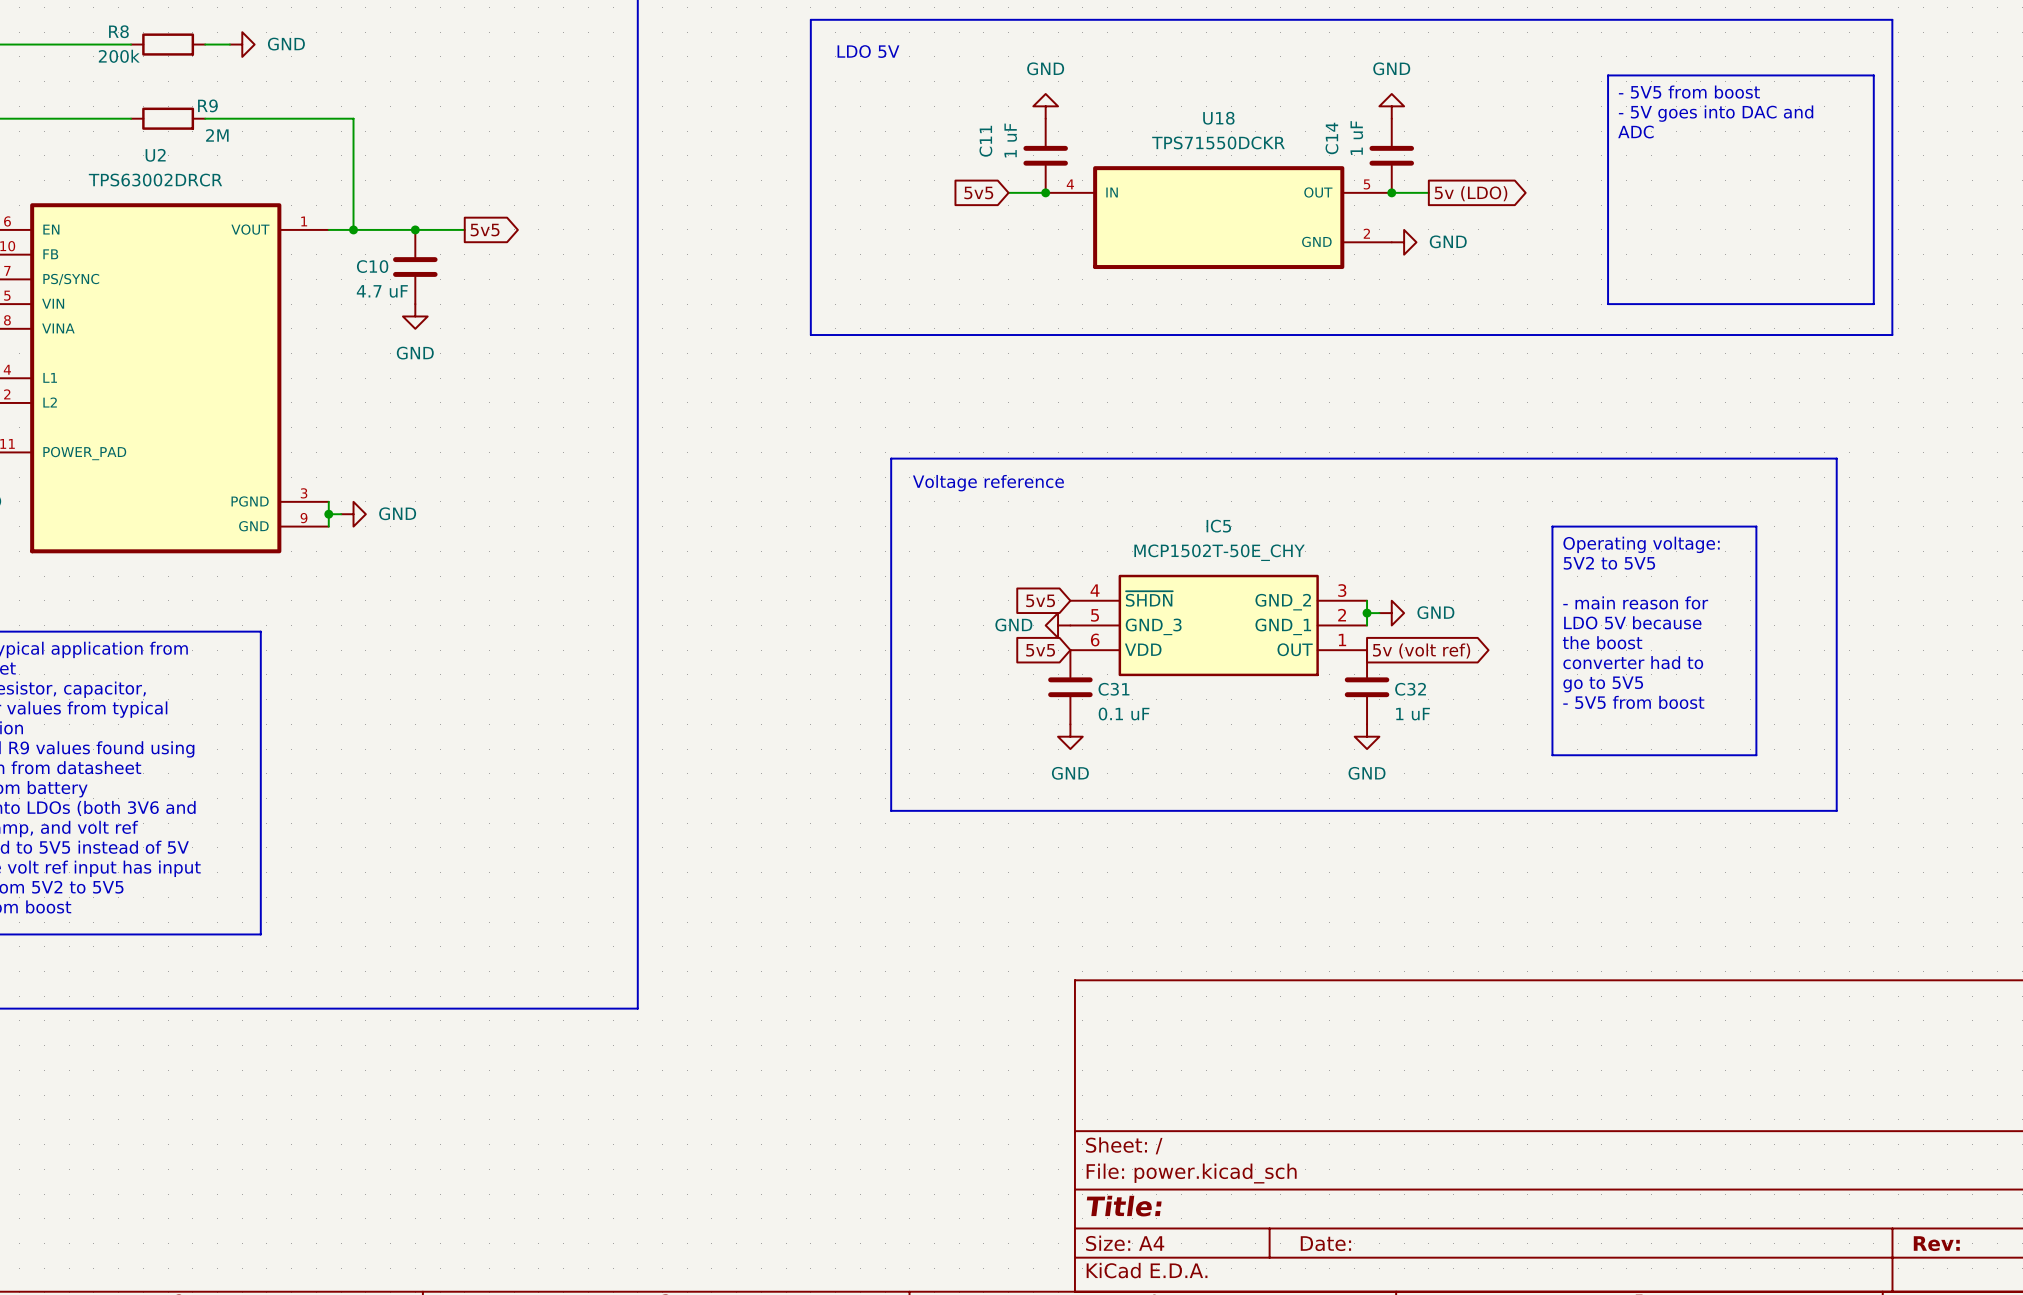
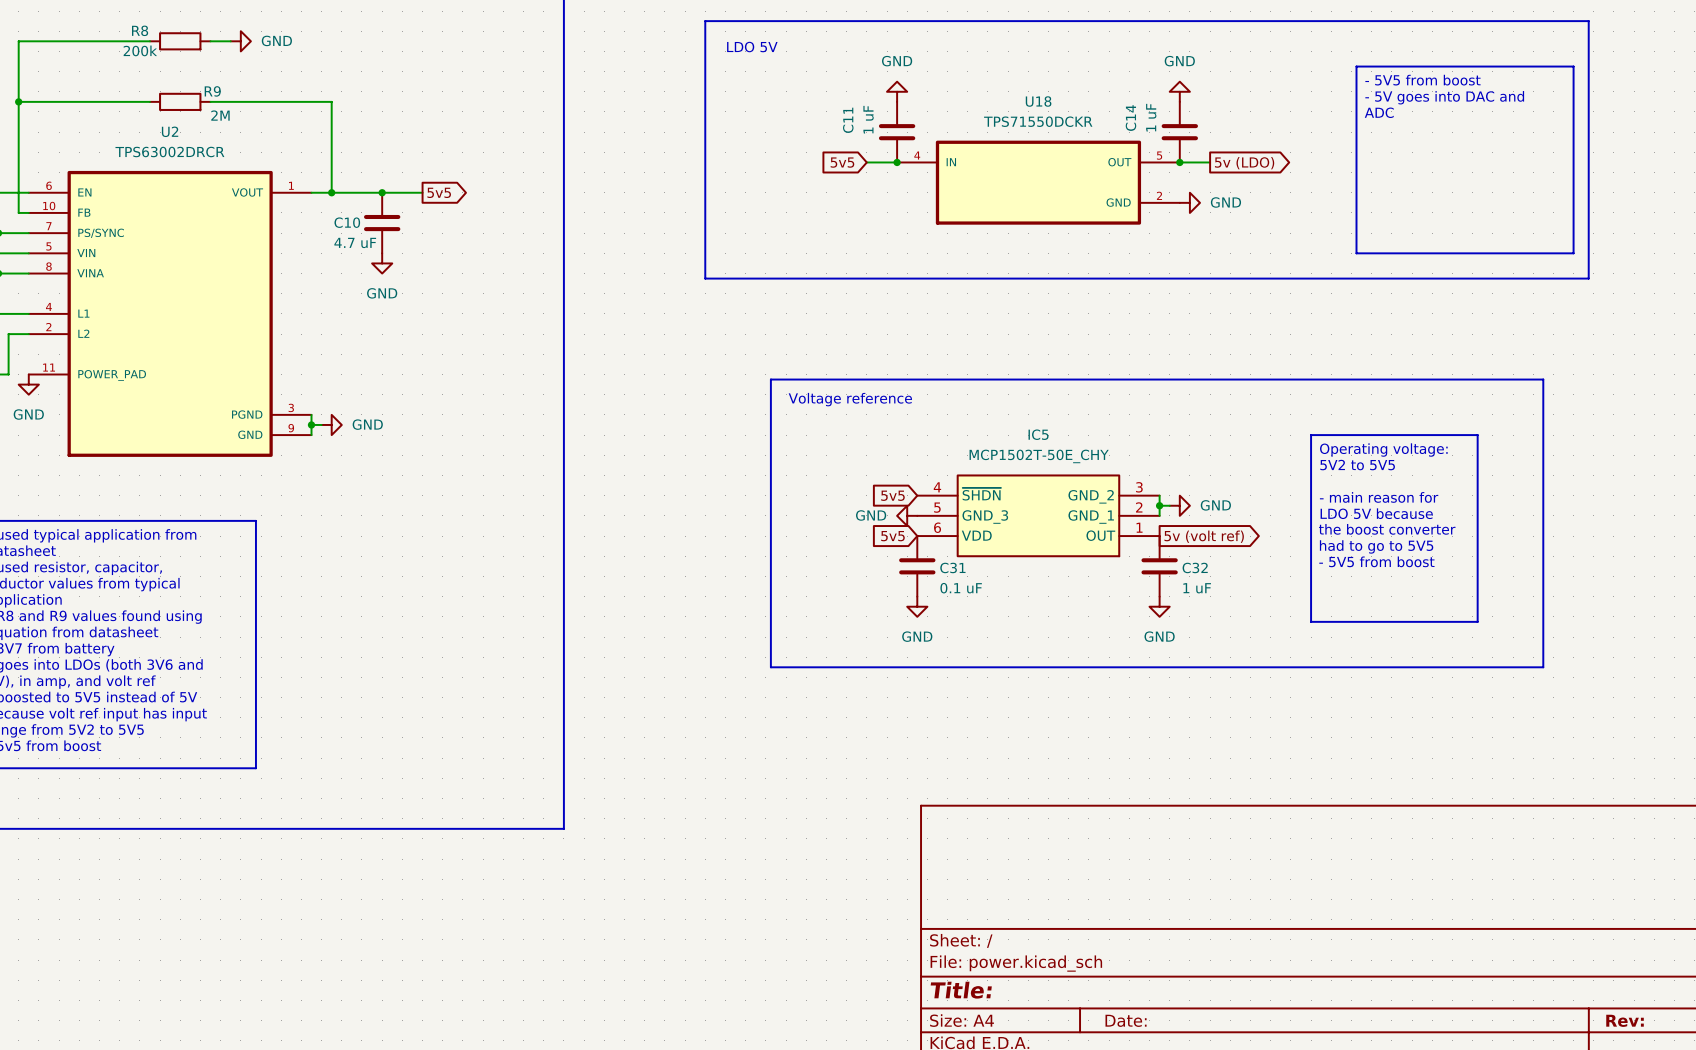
text: the boost (1602, 642) -> the boost converter (1387, 529)
text: converter had to (1633, 662) -> had to go to 5V5 (1376, 546)
text: go to 5V5 (1603, 684) -> - 5V5 from boost (1376, 561)
text: - 5V5 from boost (1633, 702) -> none

